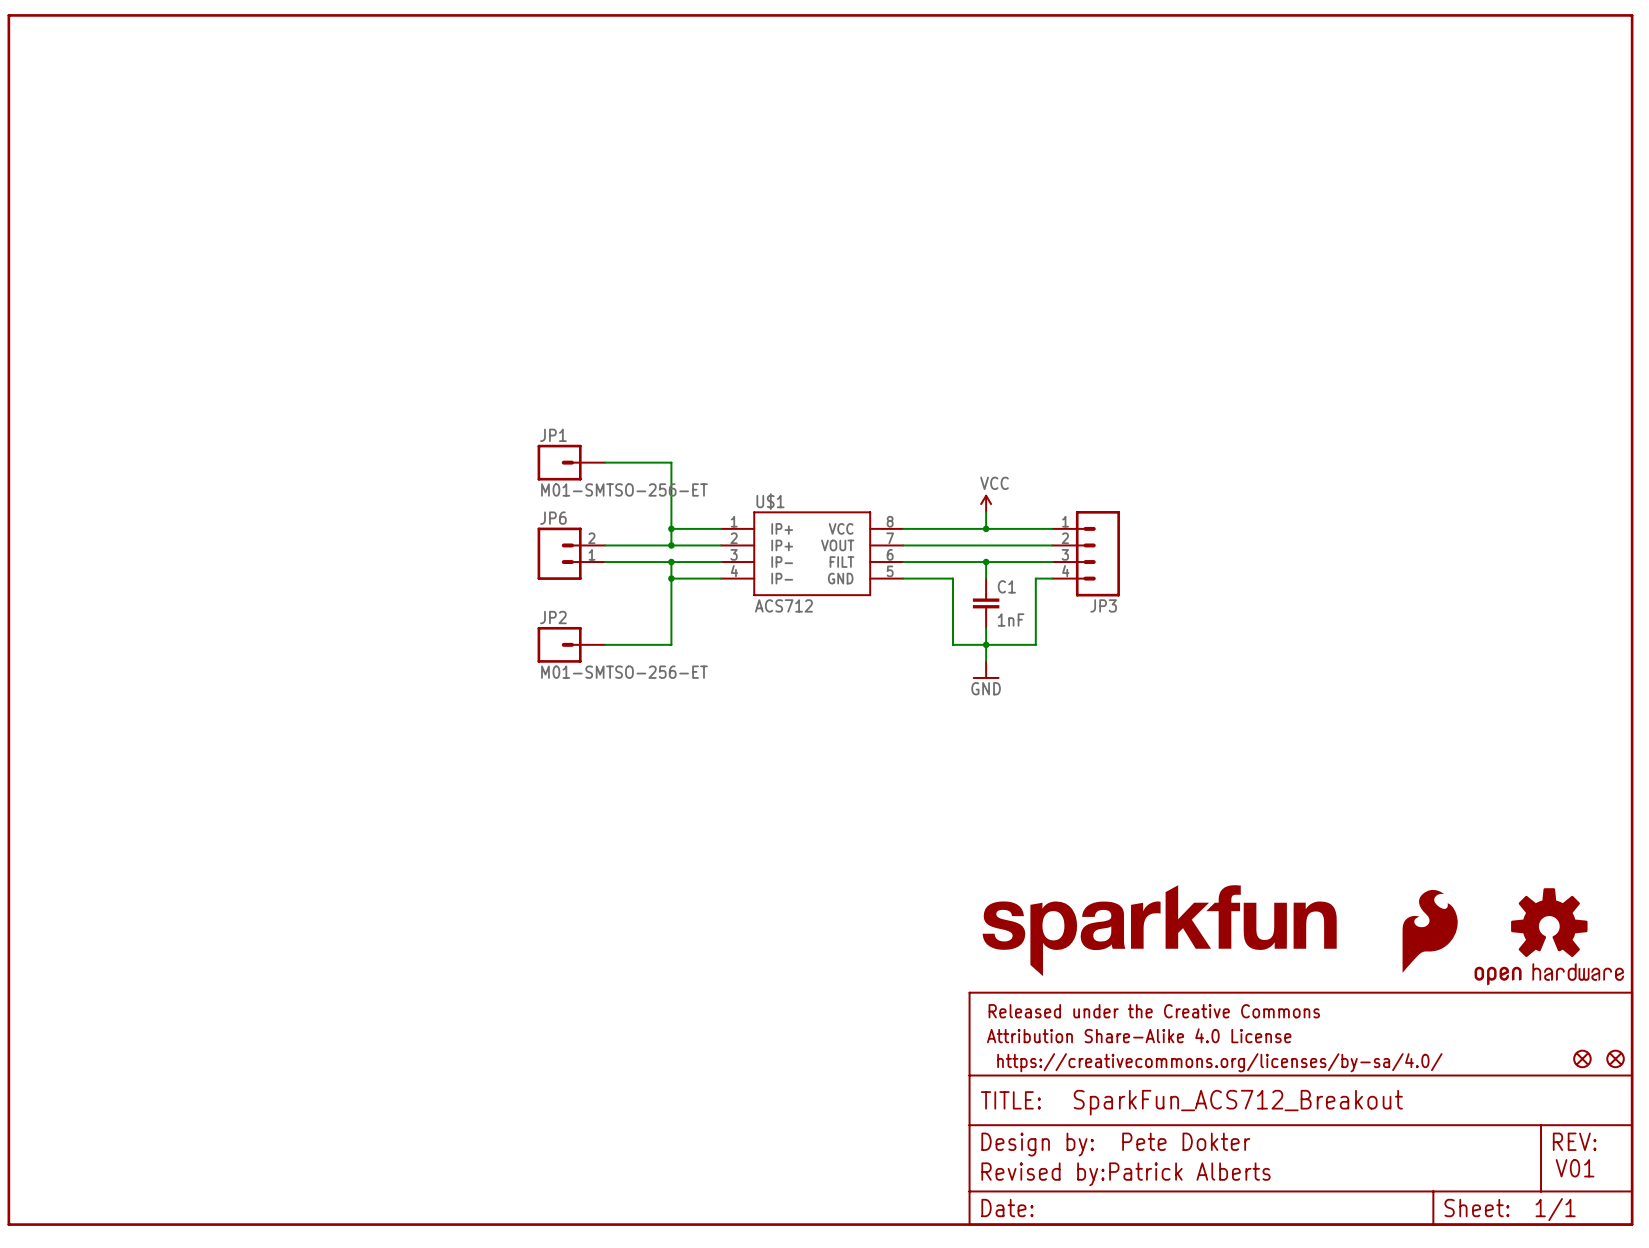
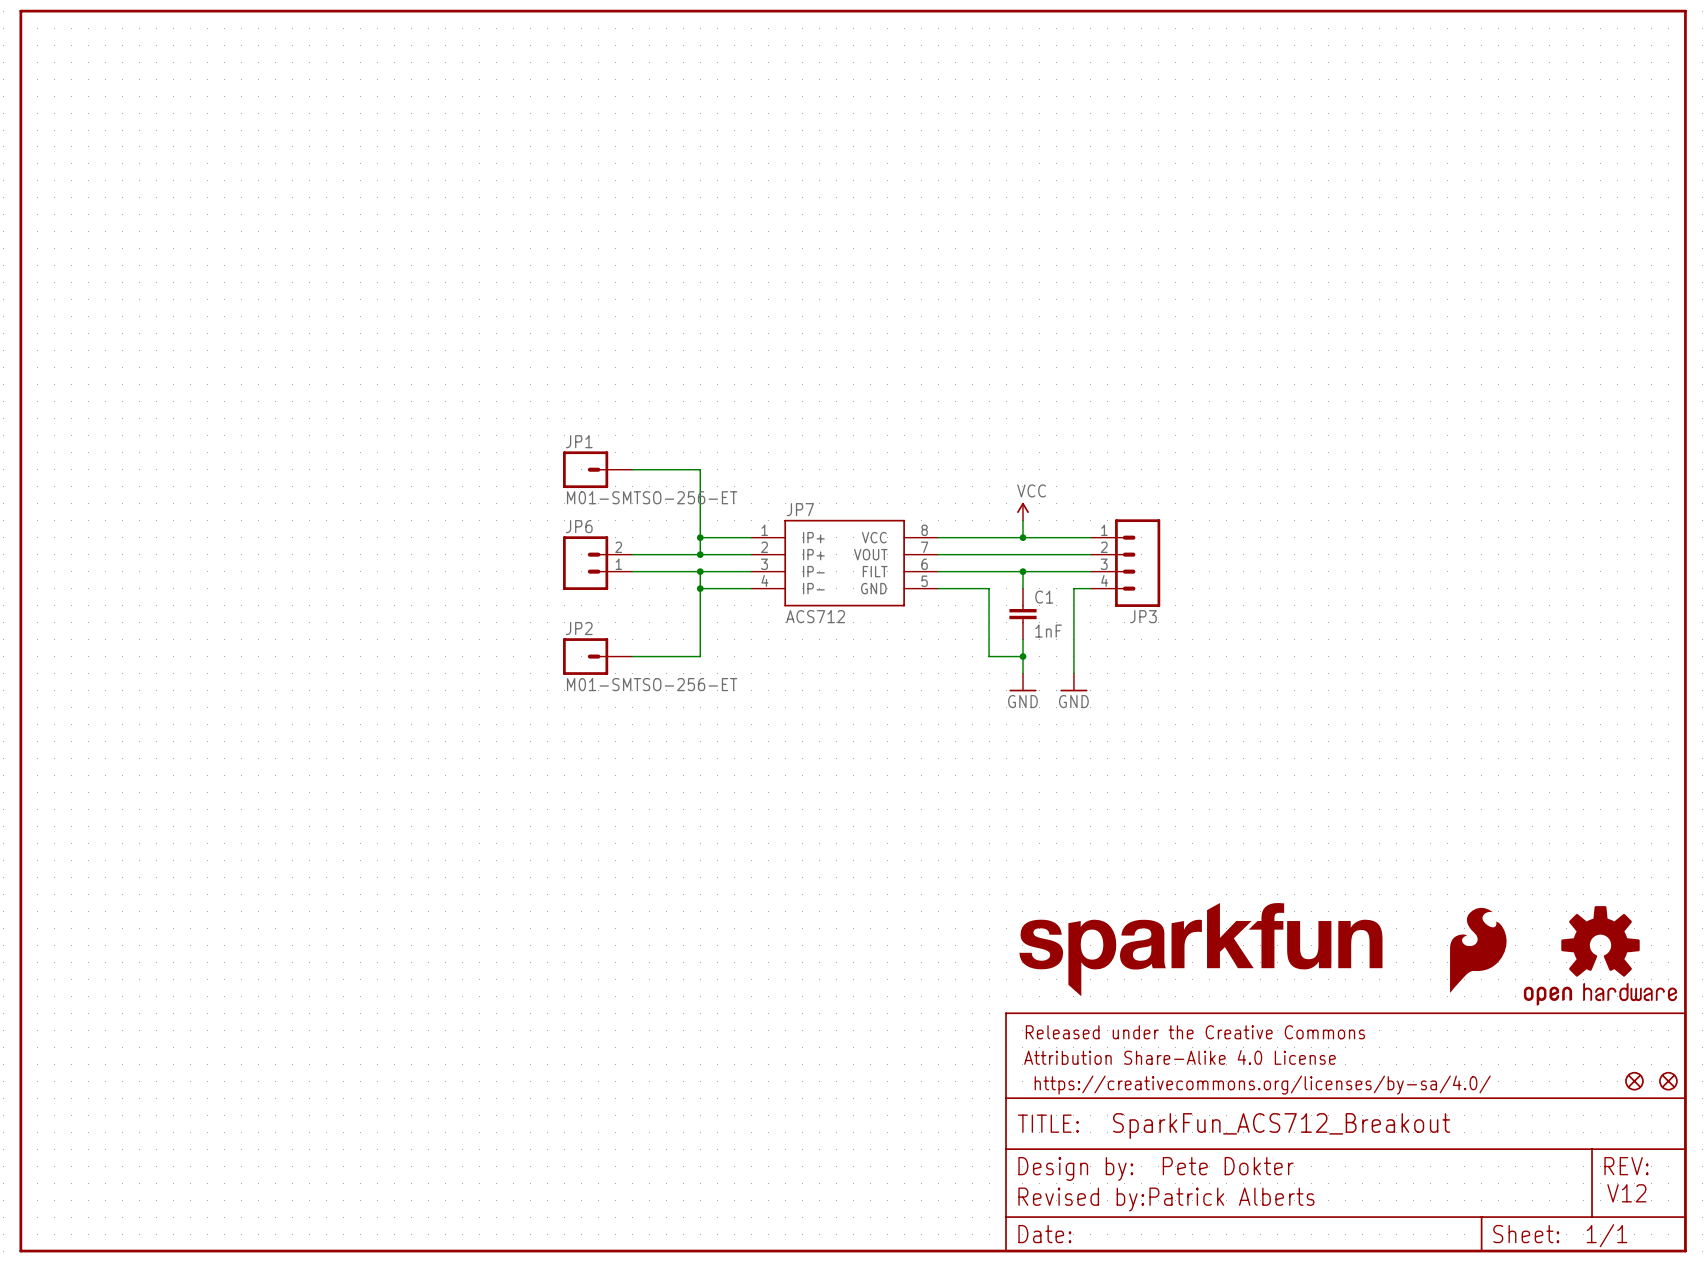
U$1 name: U$1 (770, 501) -> JP7 (800, 509)
wire: (986, 644) (1035, 644) -> (1073, 673) (1073, 656)
power symbol: none -> GND (1073, 682)
text: V01 (1575, 1168) -> V12 (1626, 1193)

